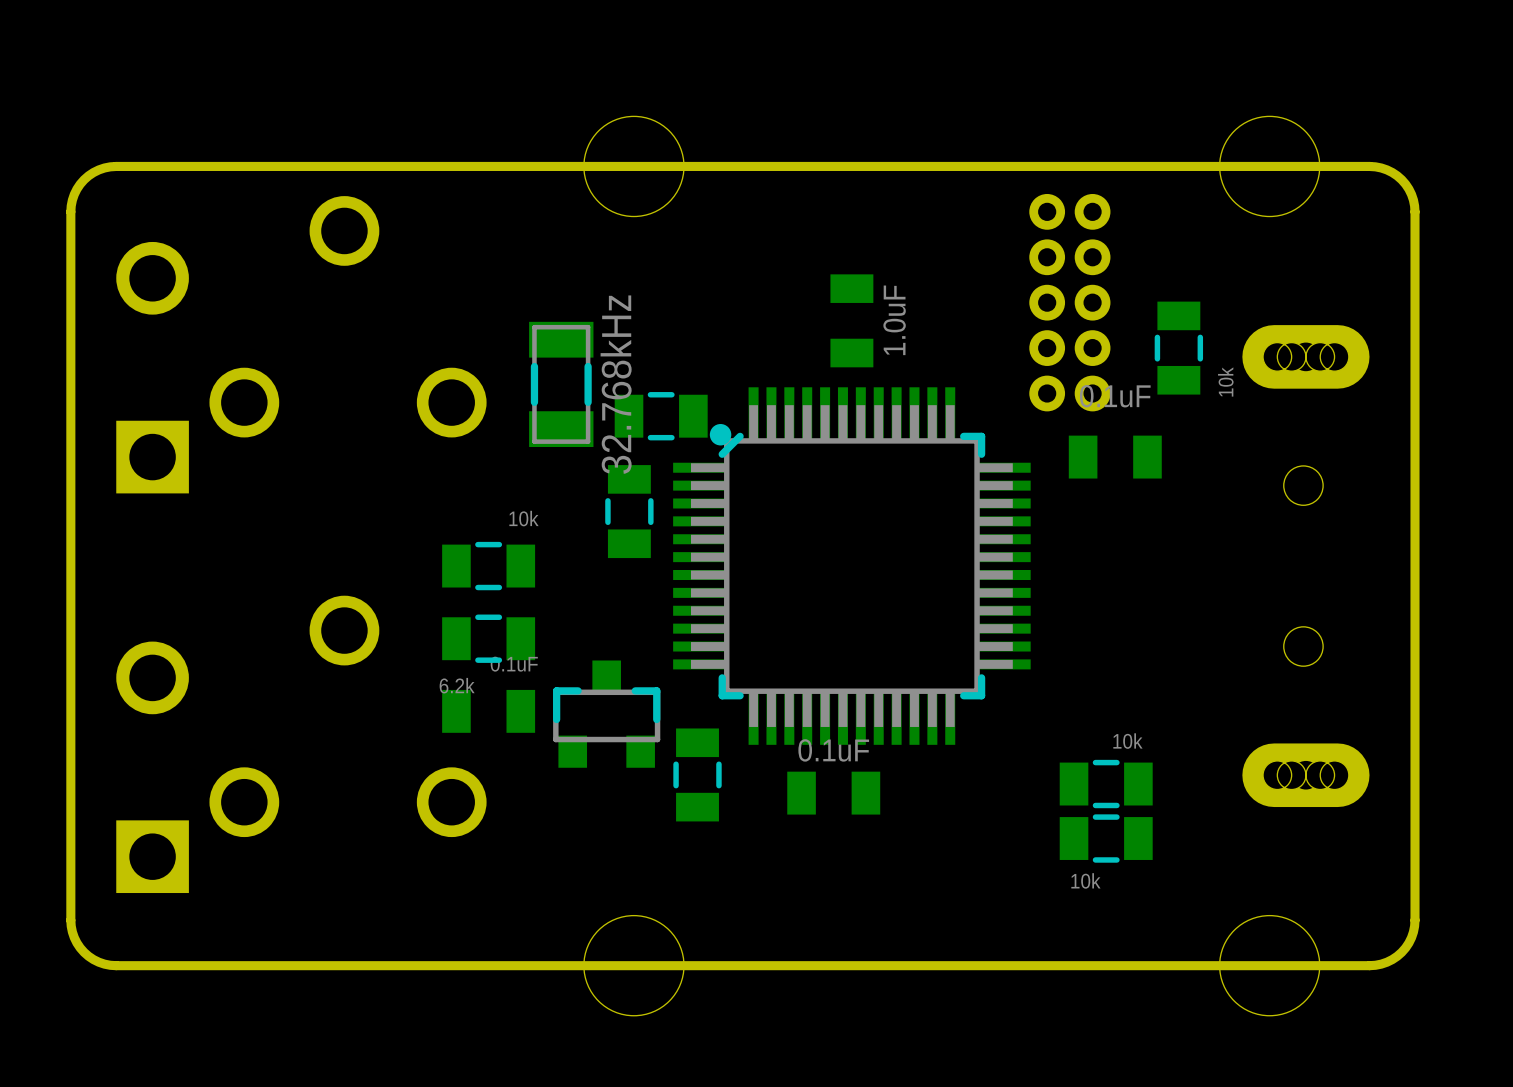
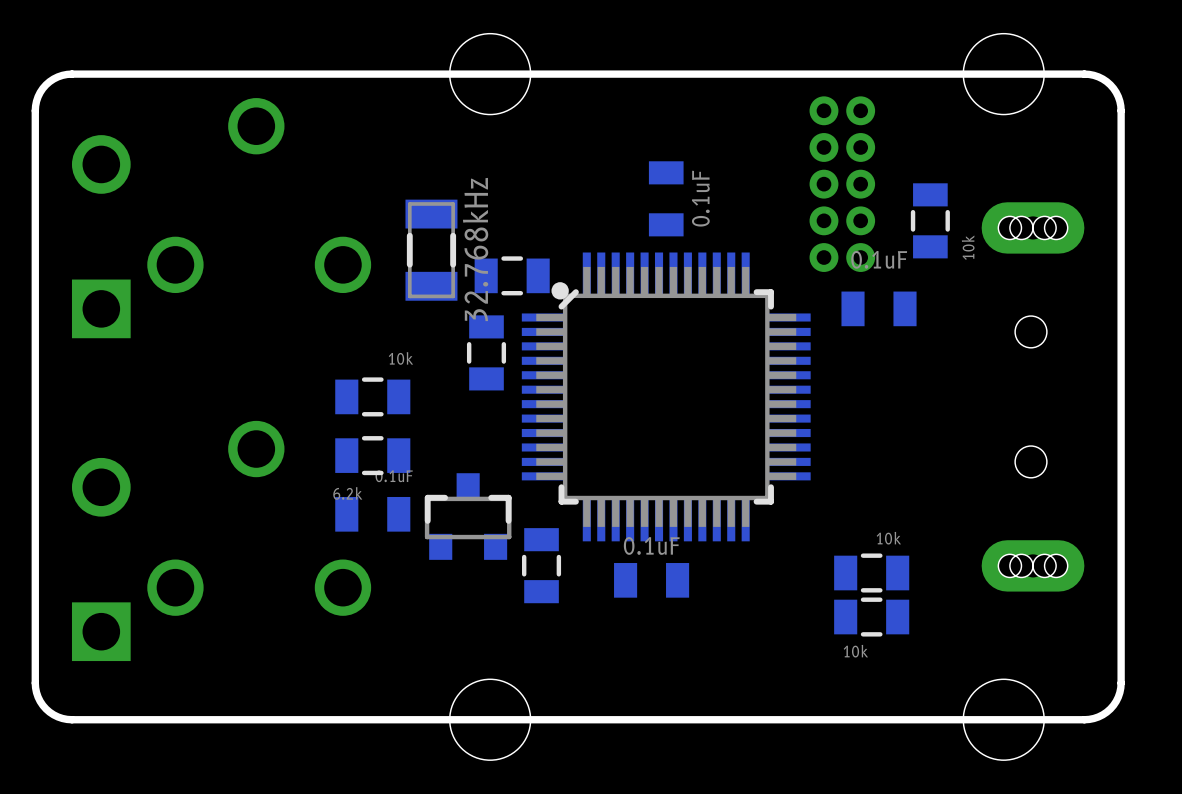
part value: 1.0uF (894, 320) -> 0.1uF (700, 198)

